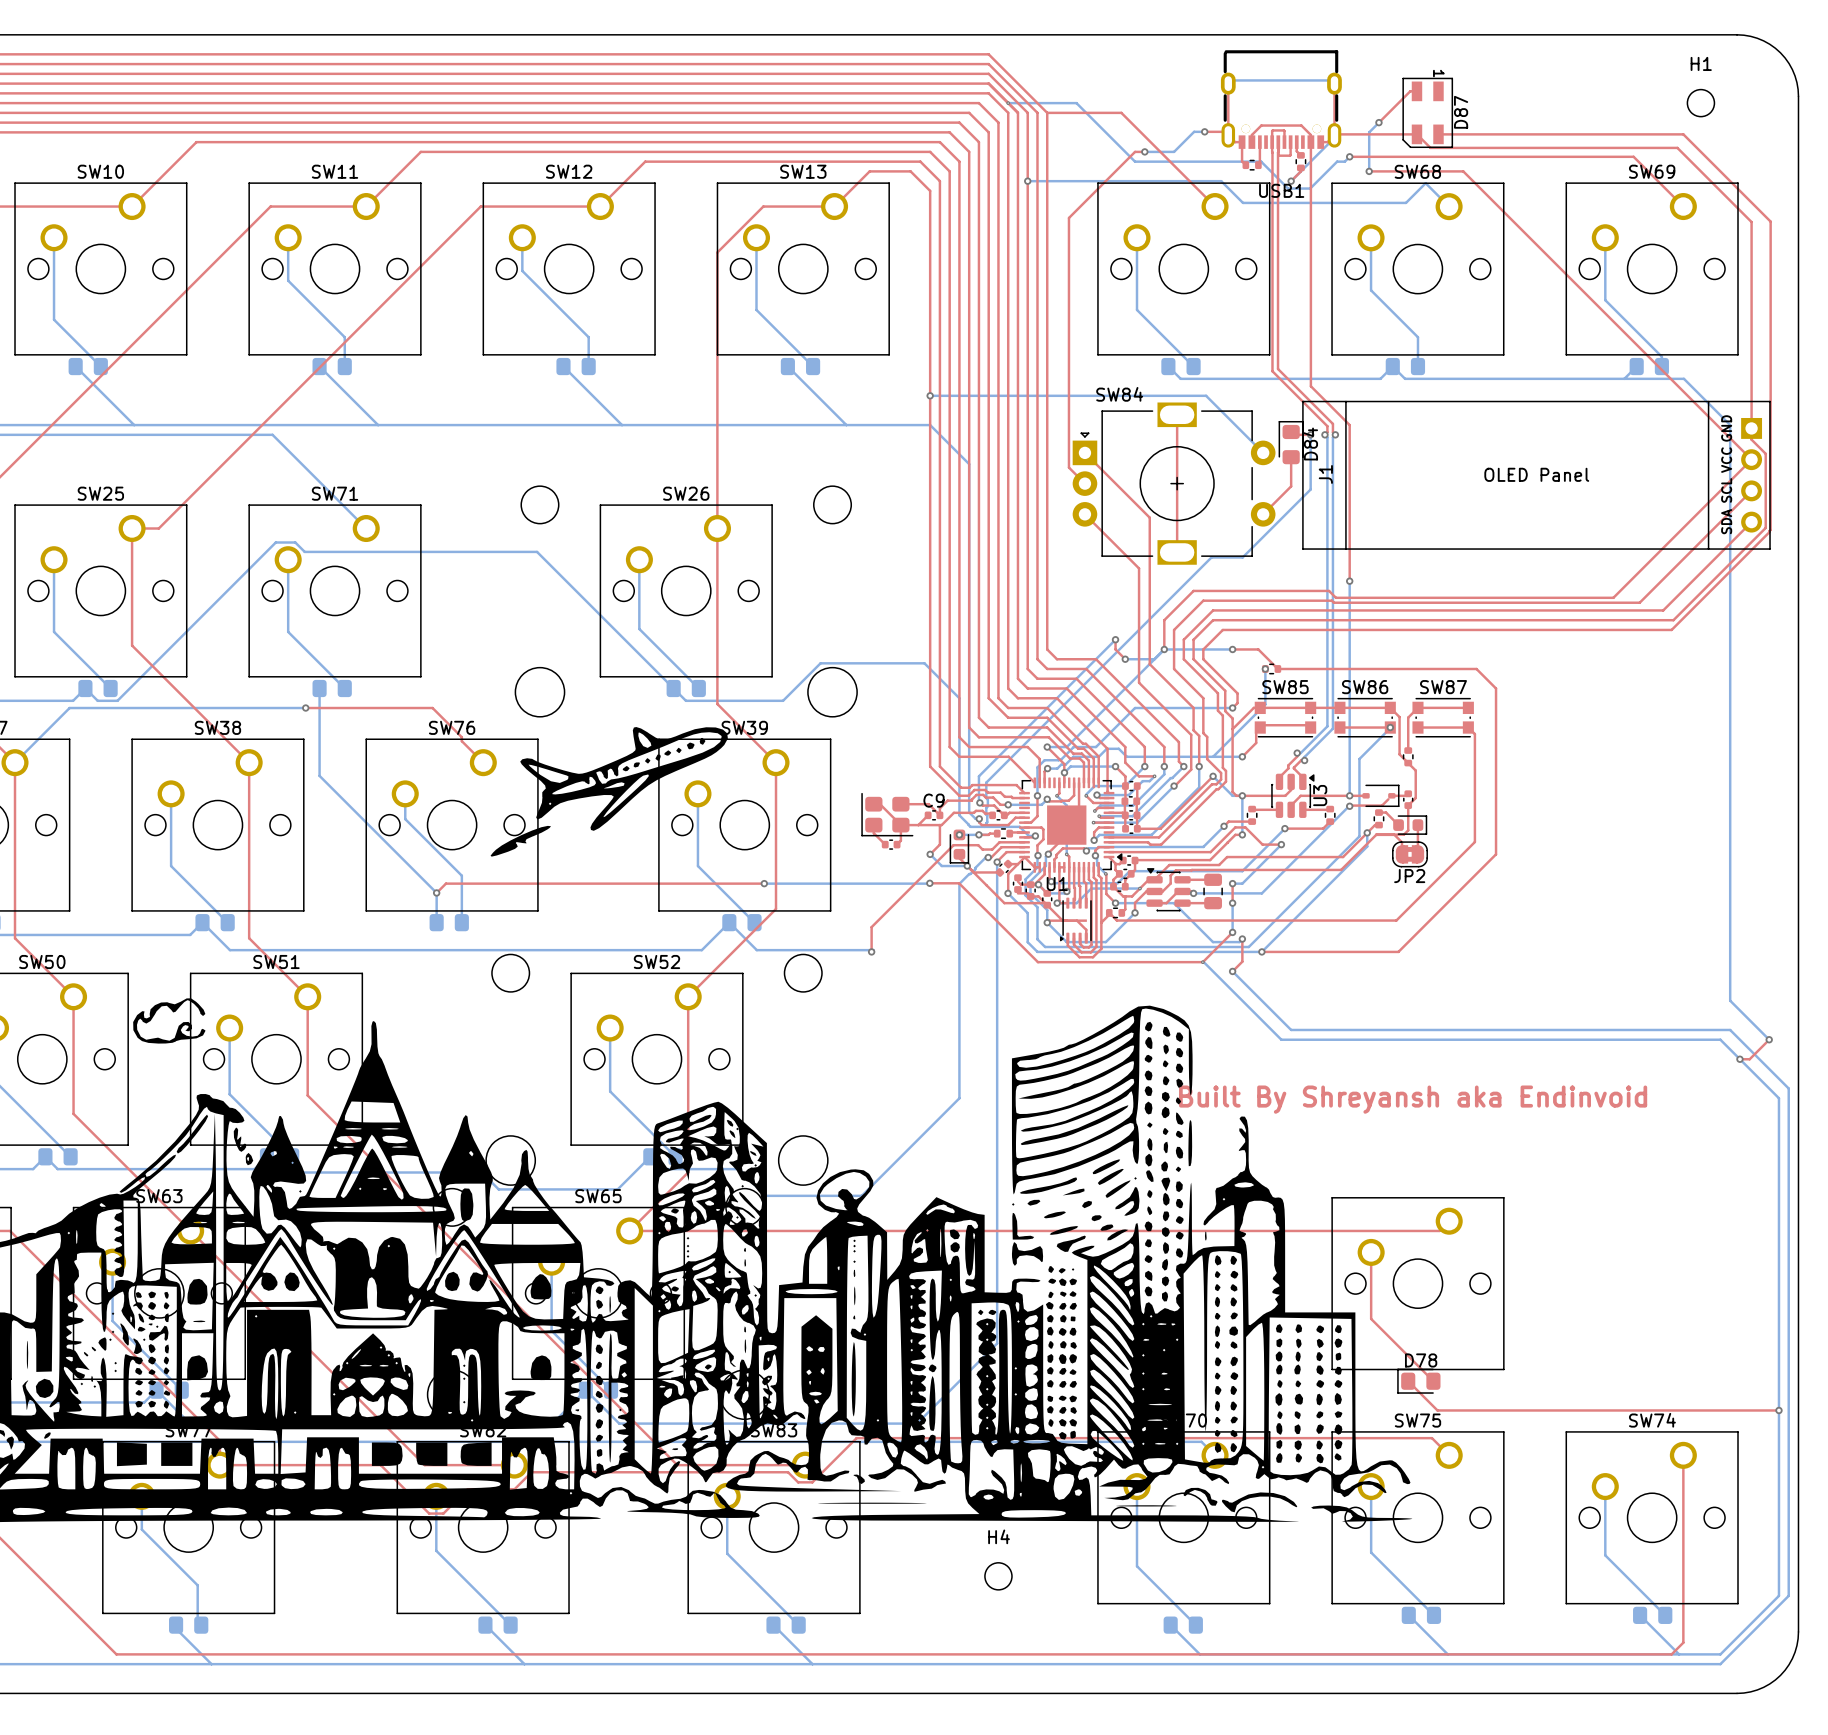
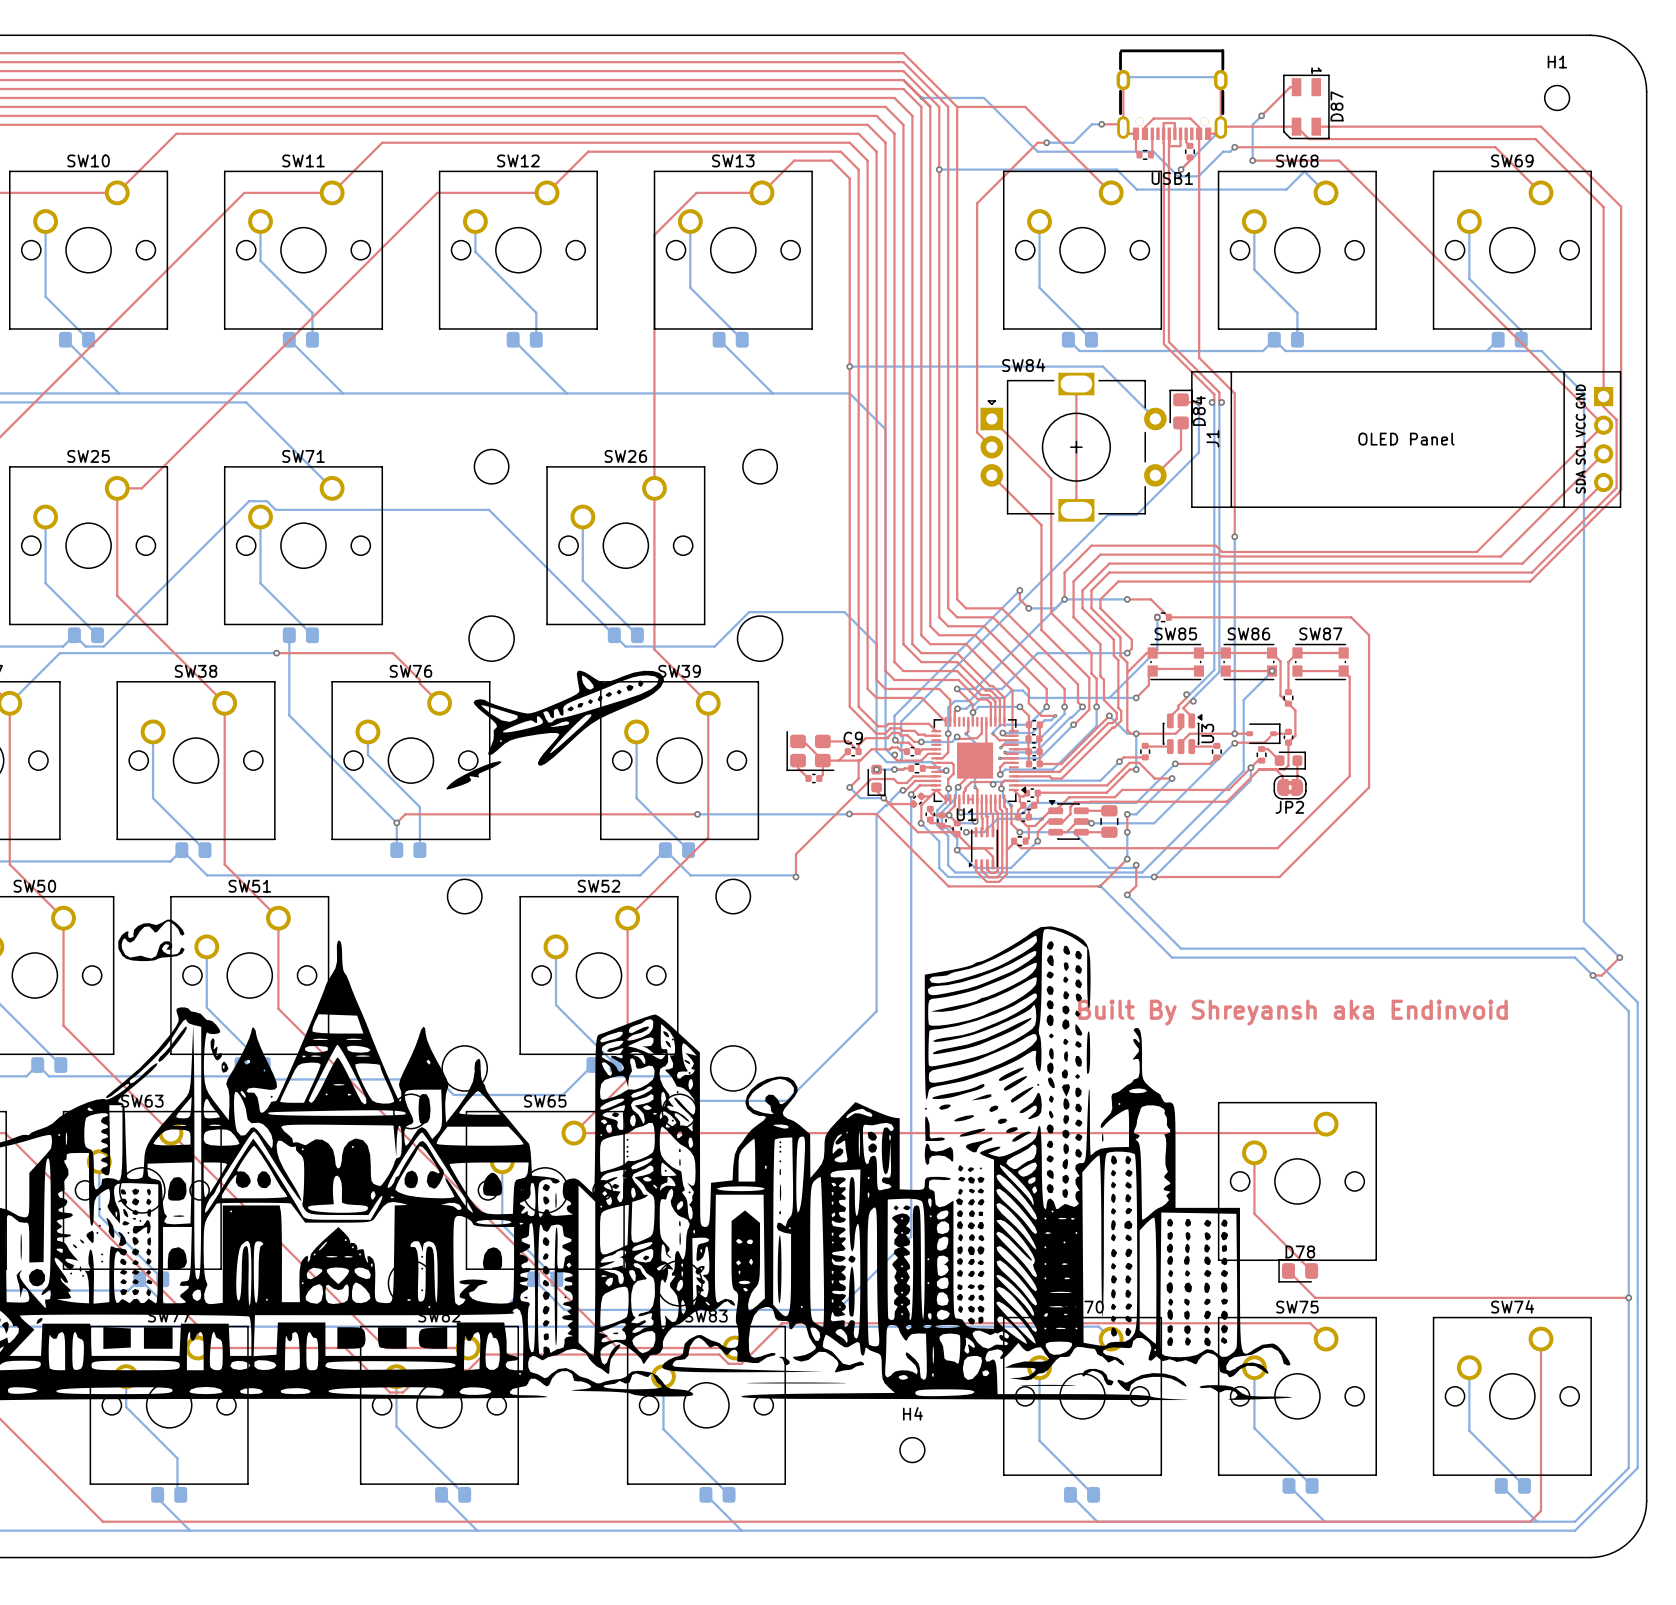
top track: (1059, 867) (1059, 900) (1057, 903) -> none

